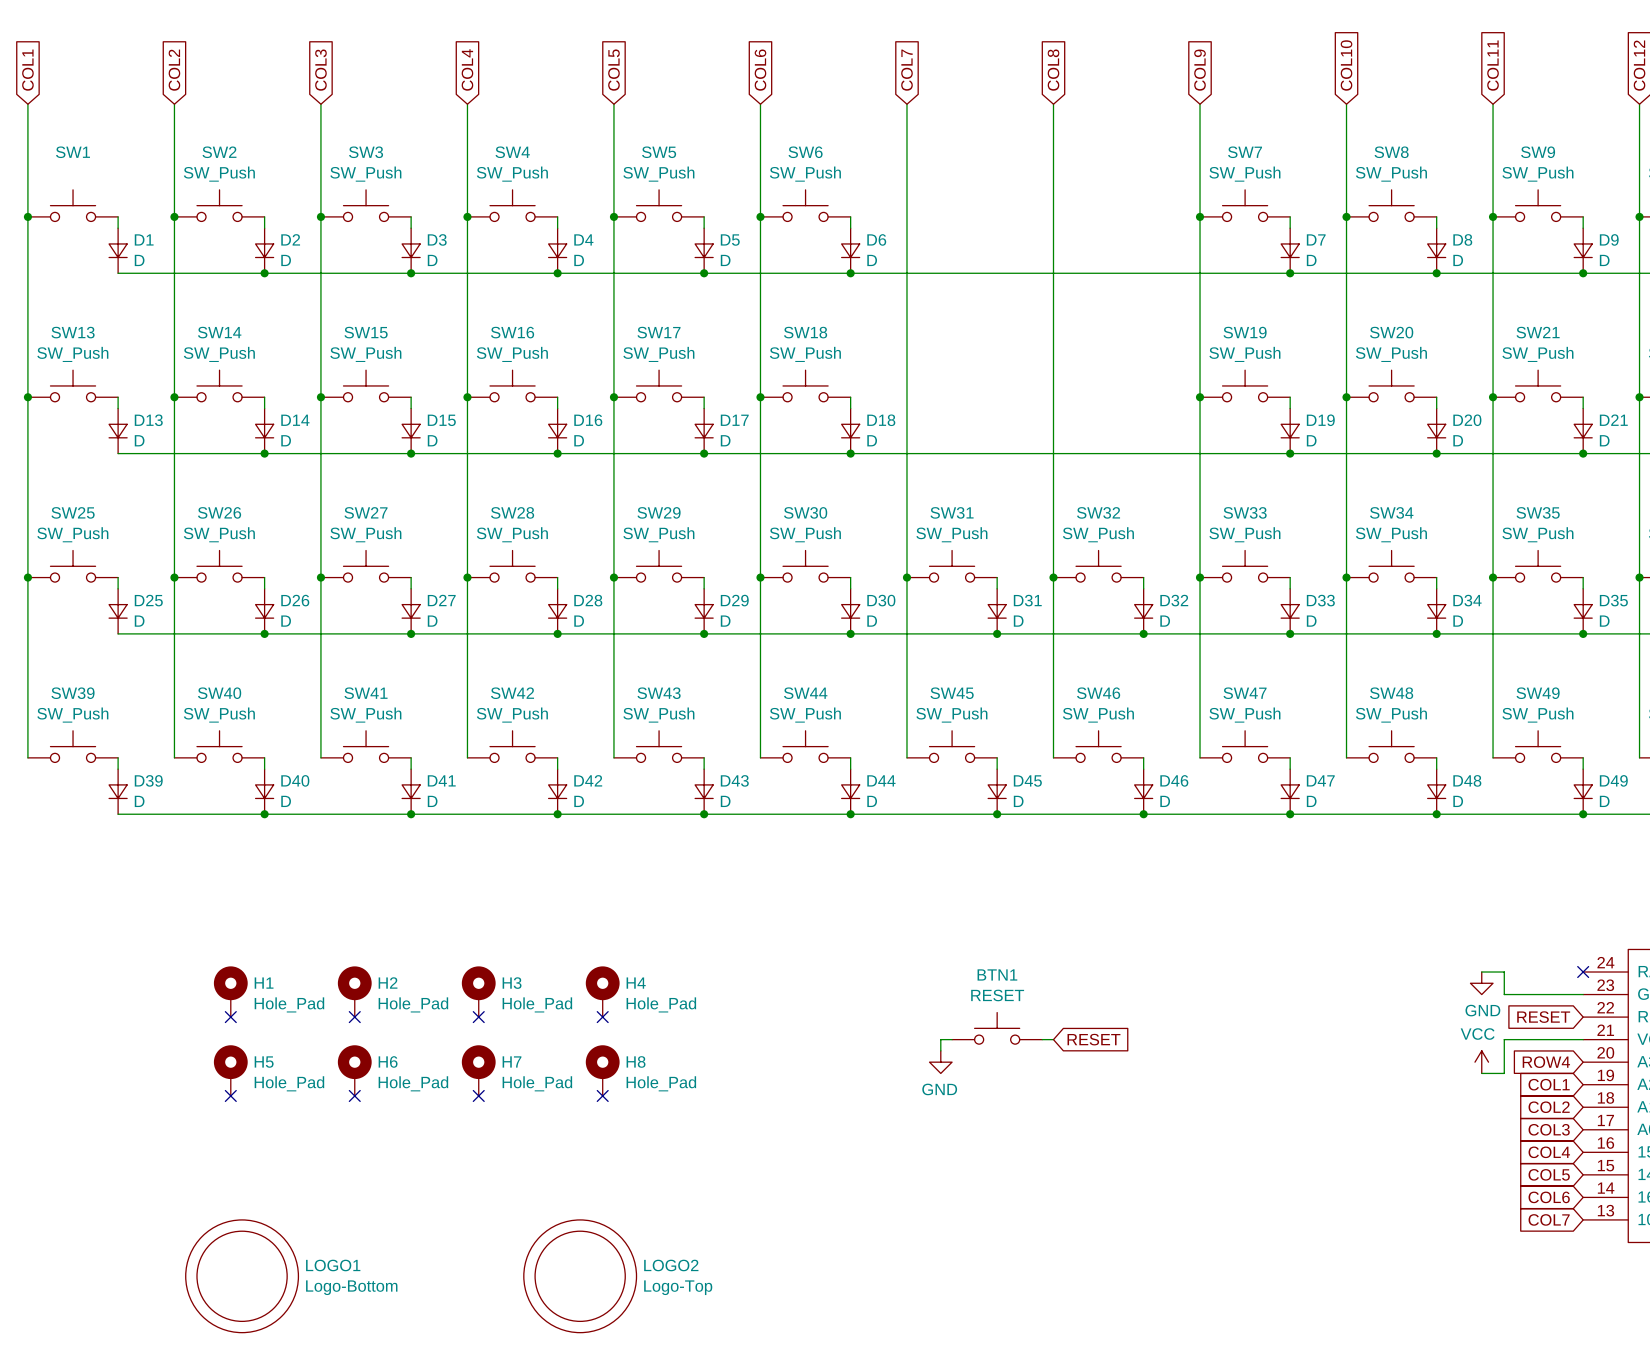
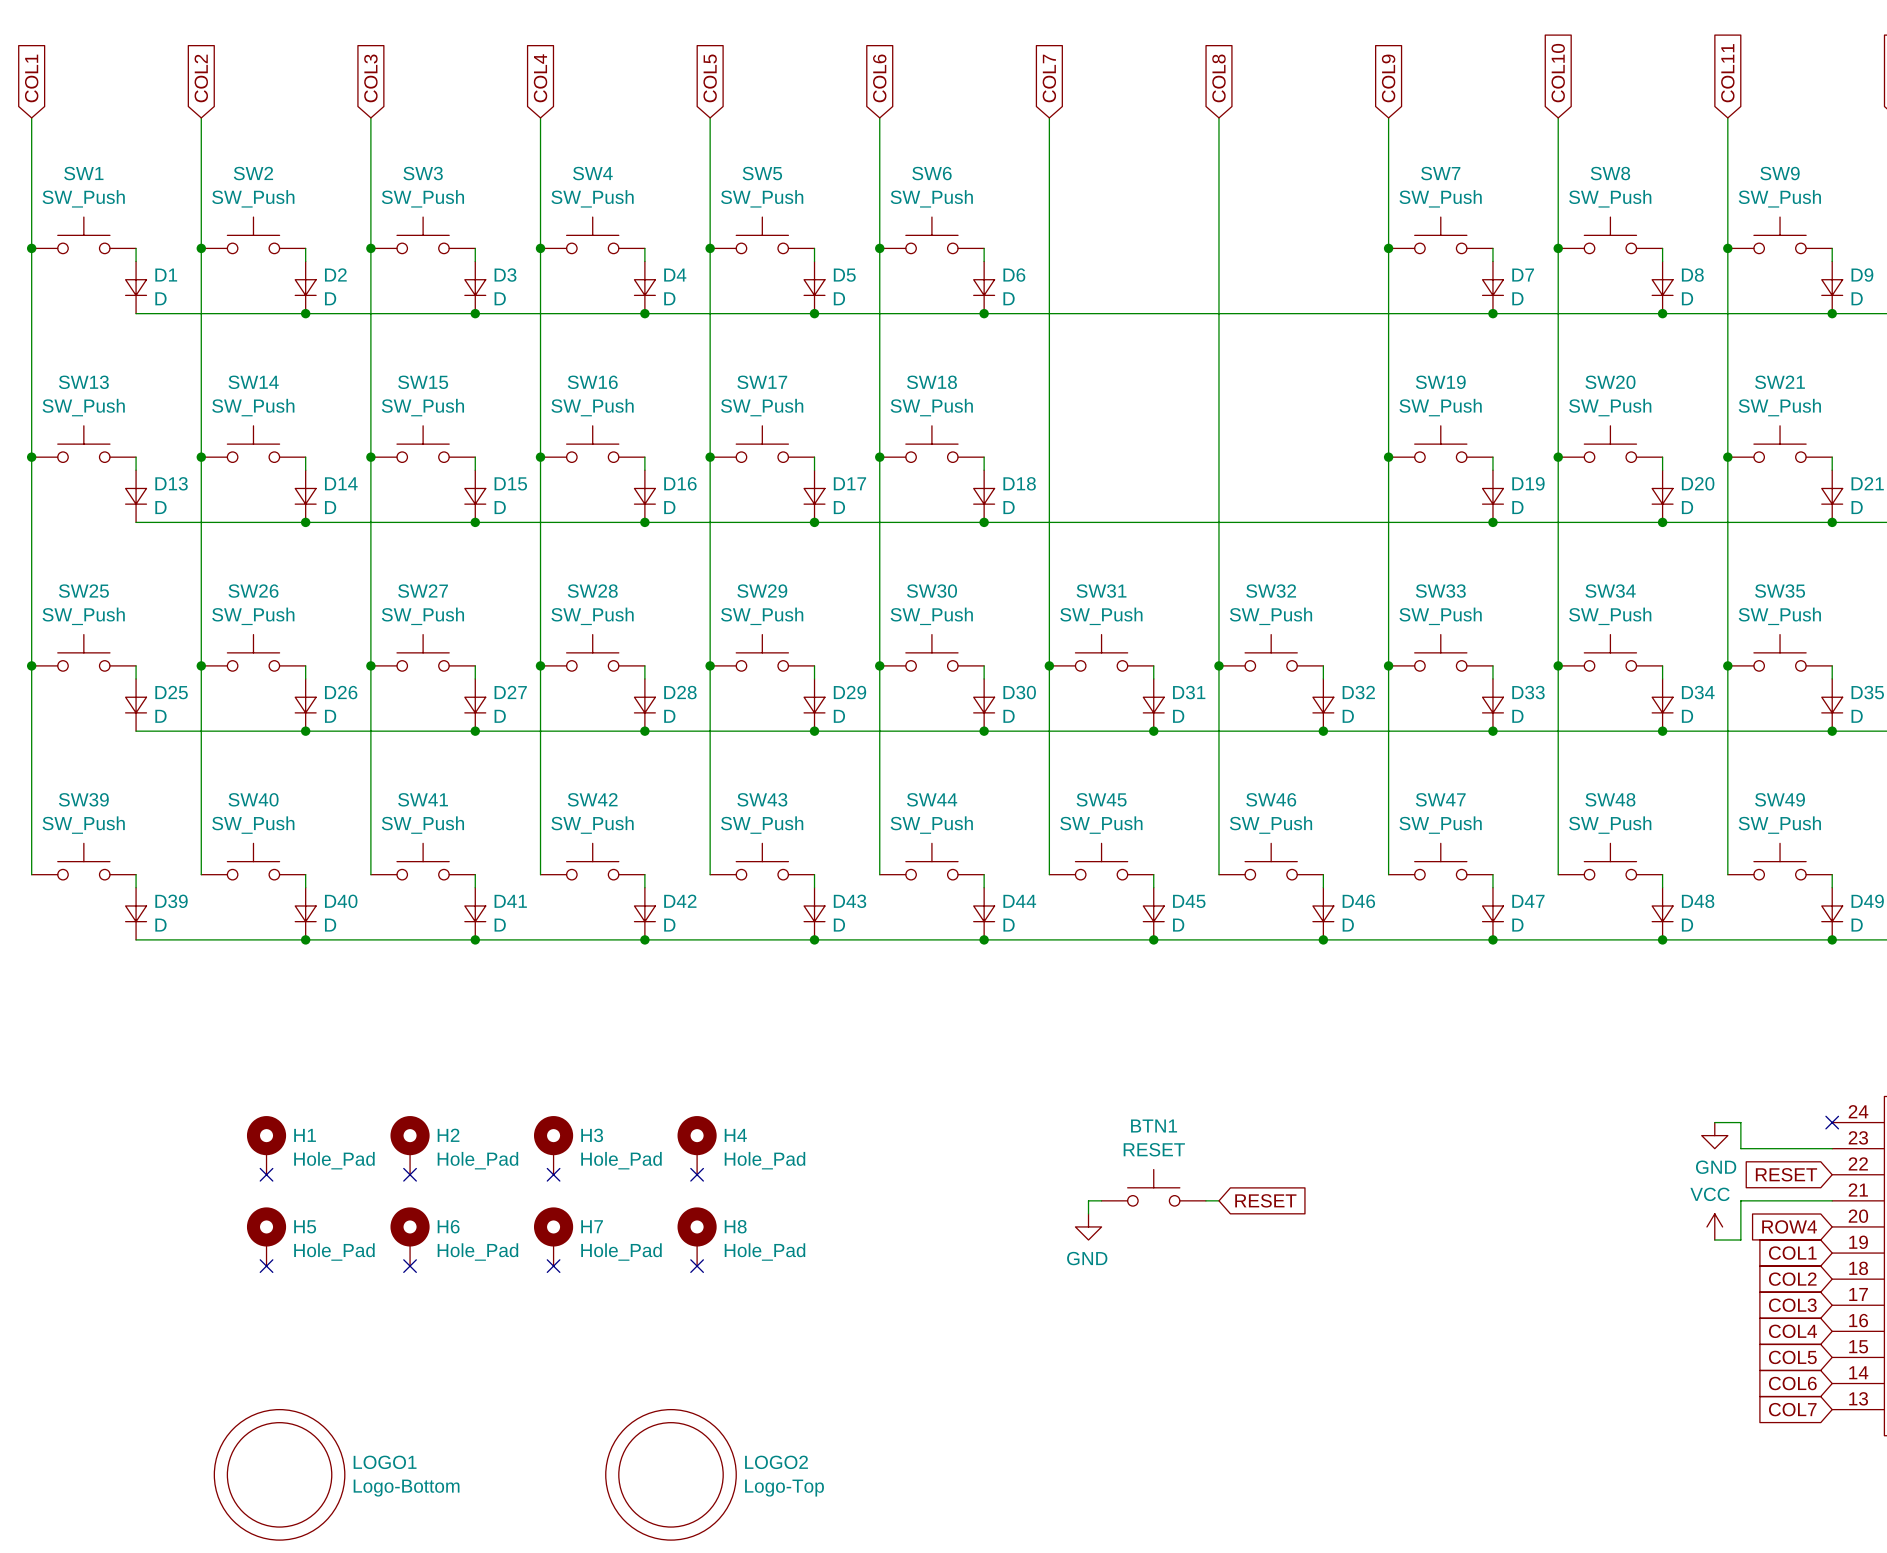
SW1 value: none -> SW_Push (83, 198)

